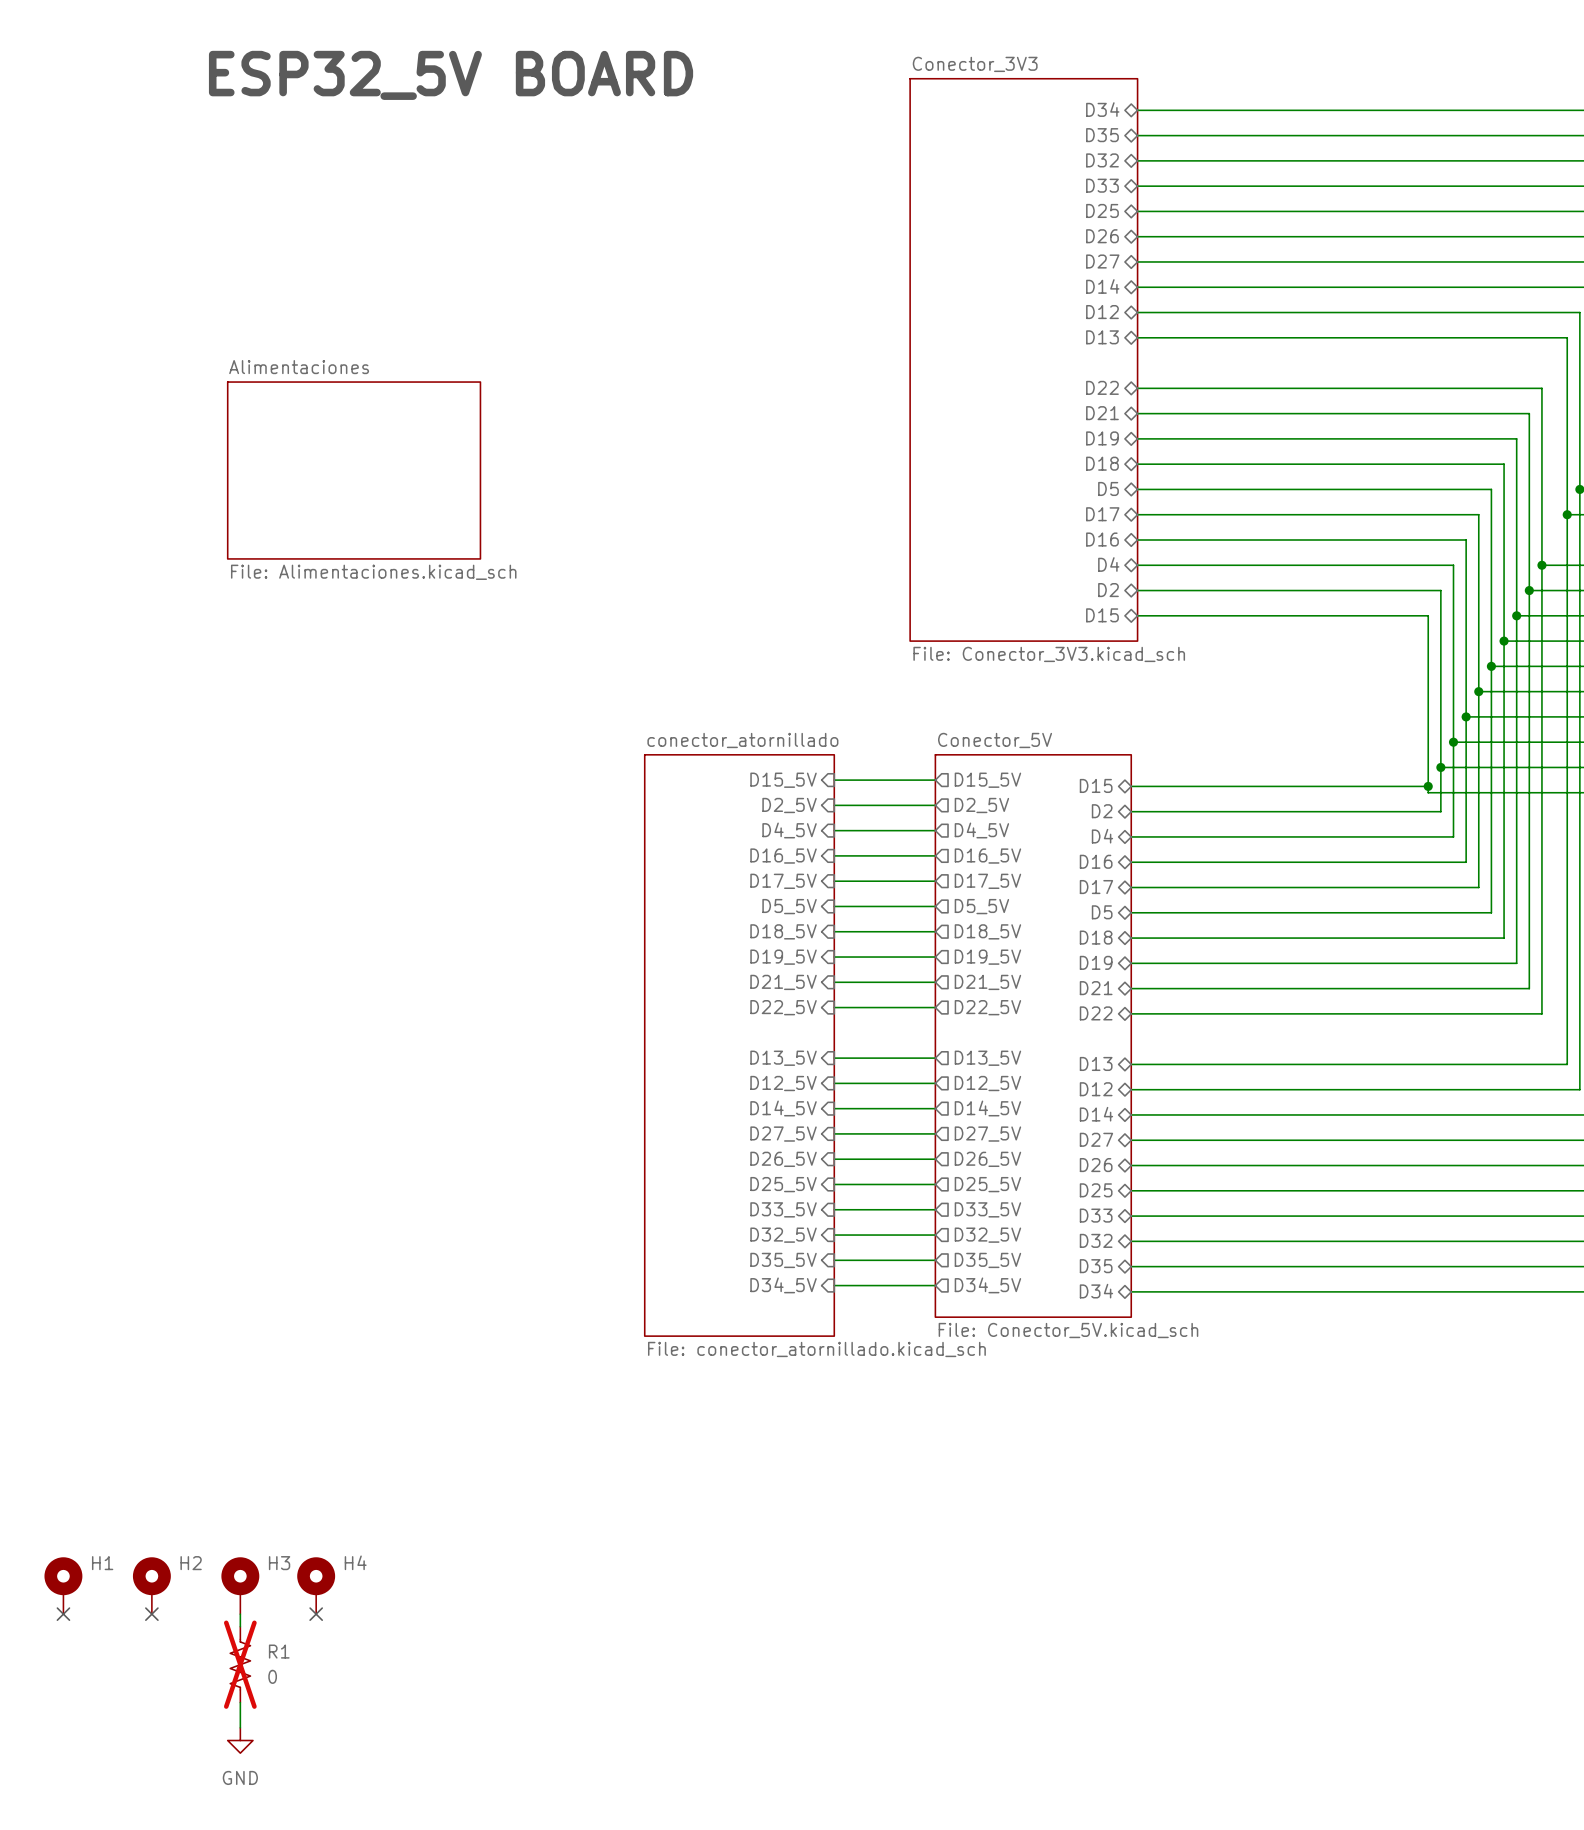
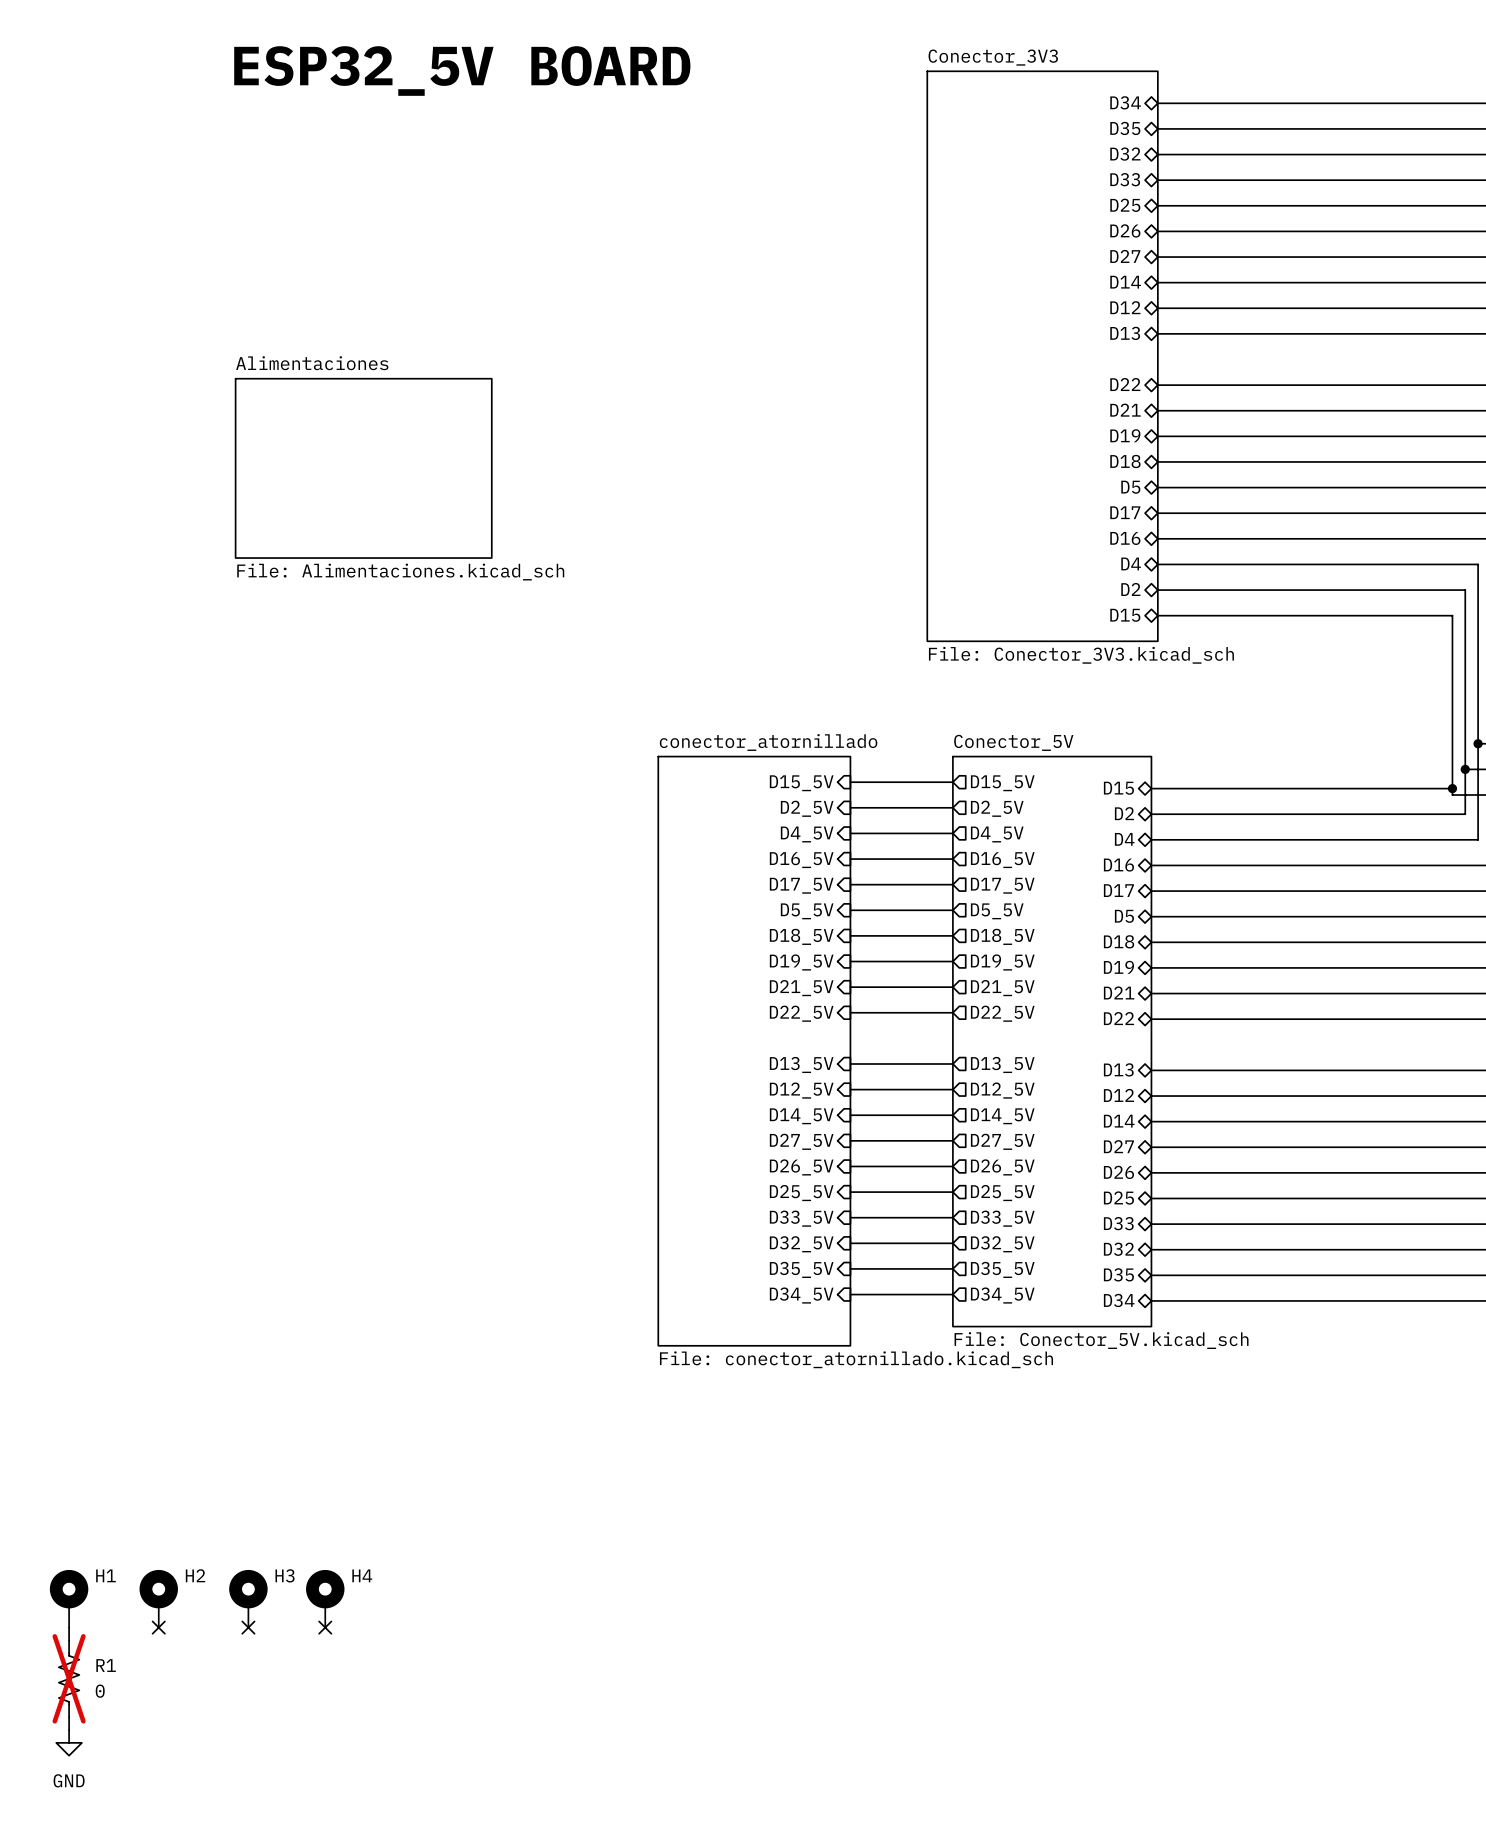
no-connect mark: (63, 1614) -> none
wire: (240, 1614) (240, 1626) -> (69, 1627) (69, 1640)
no-connect mark: none -> (248, 1627)
R1 position: (240, 1664) -> (69, 1678)
wire: none -> (69, 1717) (69, 1730)
wire: (240, 1702) (240, 1727) -> none
power symbol position: GND (240, 1740) -> GND (69, 1742)

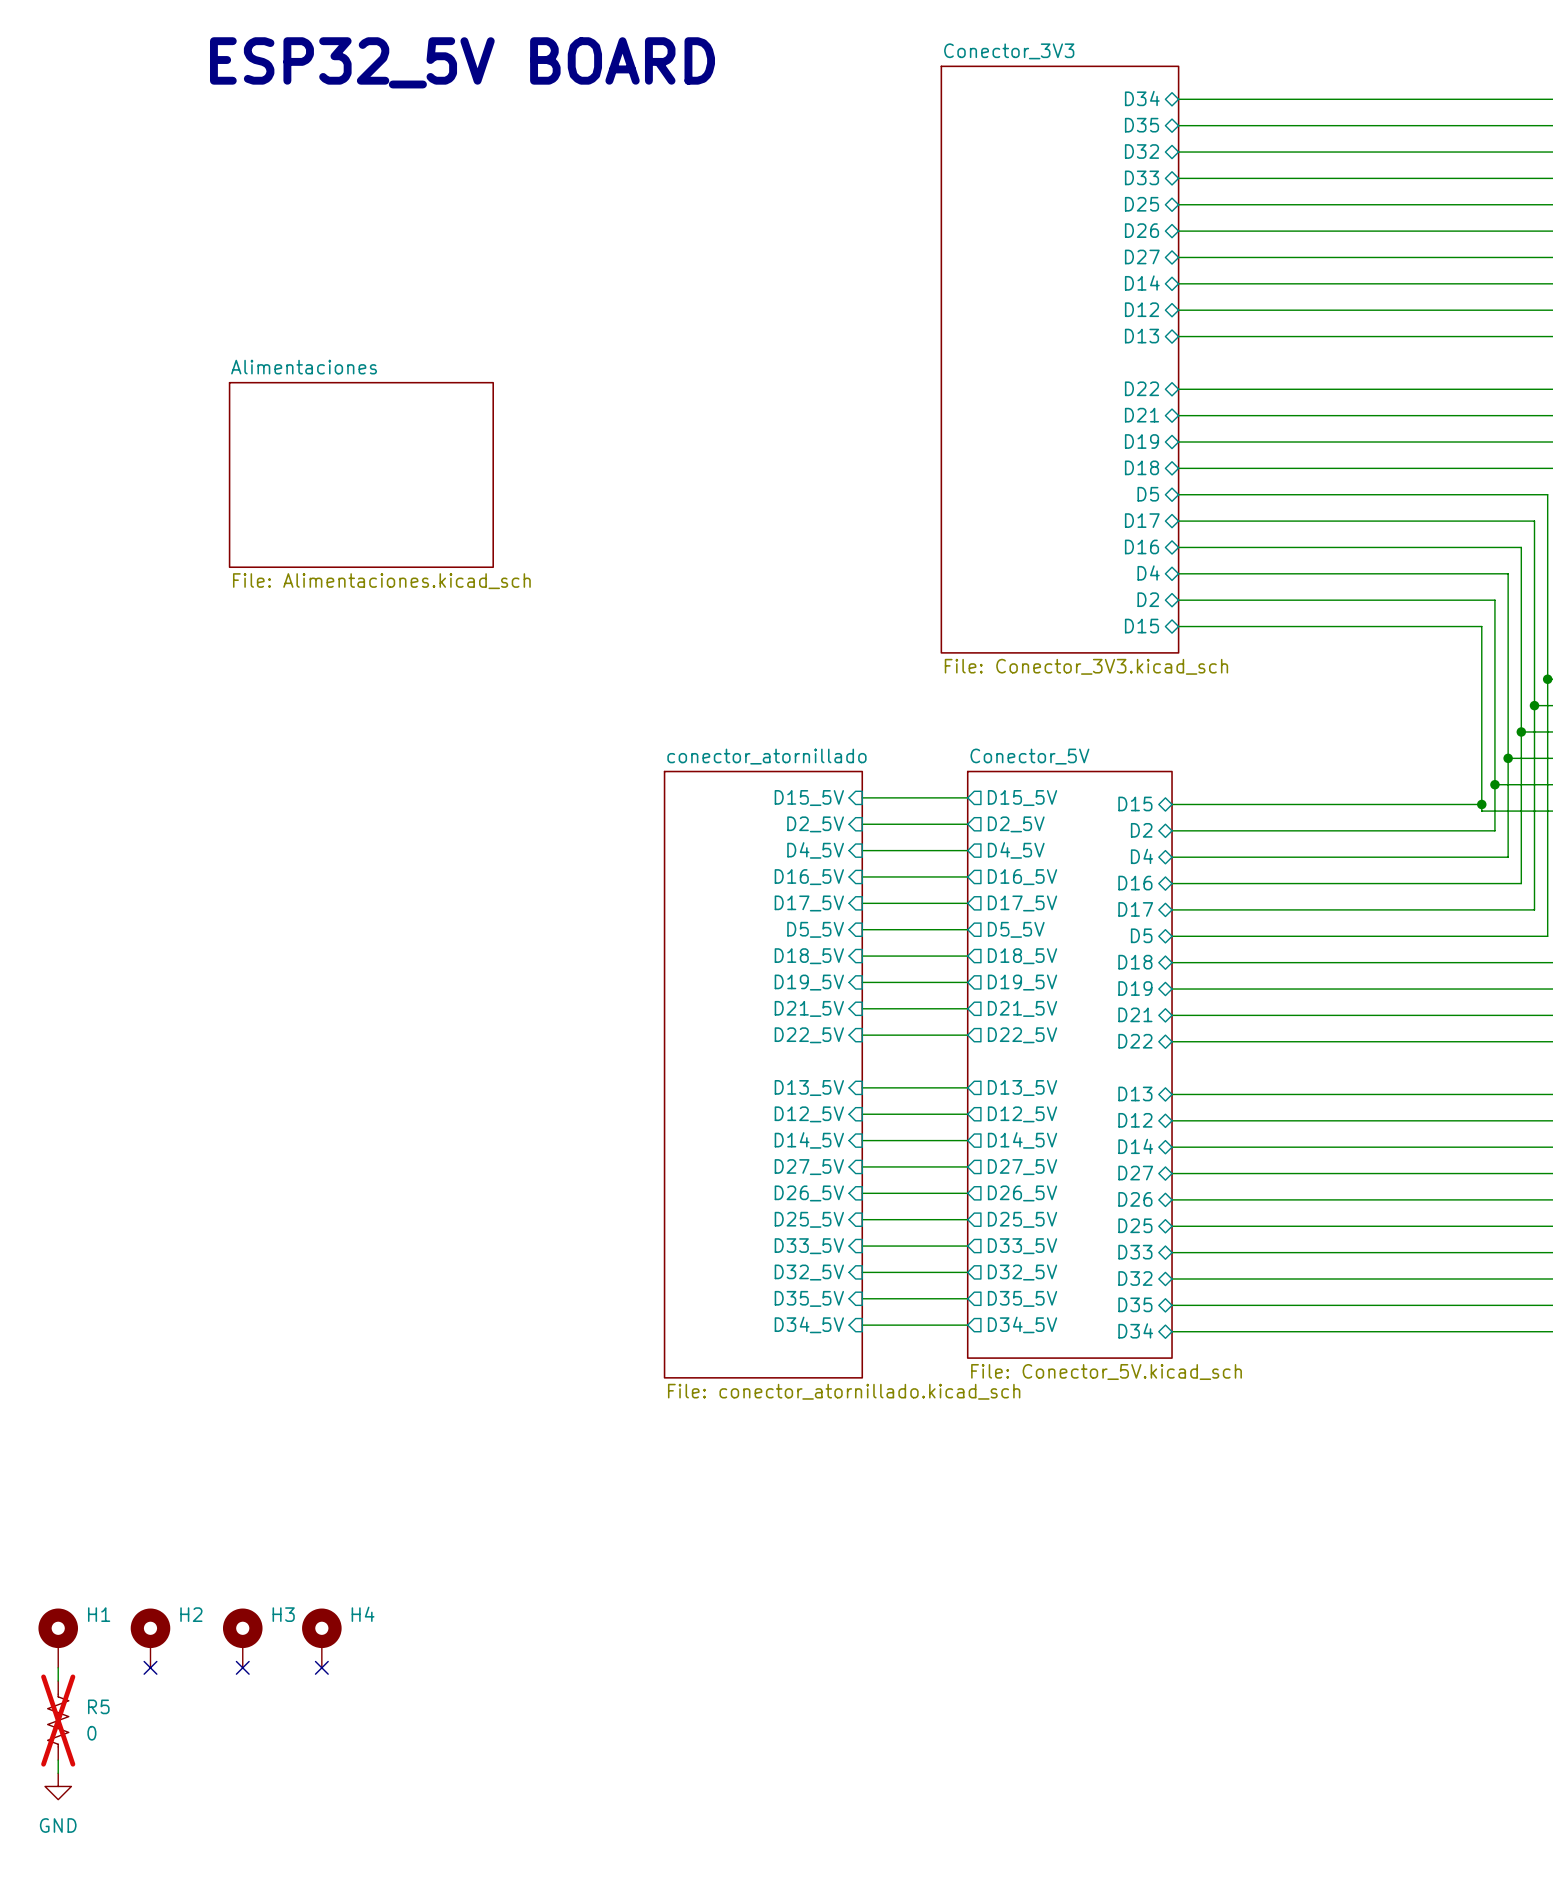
R1 name: R1 (106, 1665) -> R5 (98, 1706)

